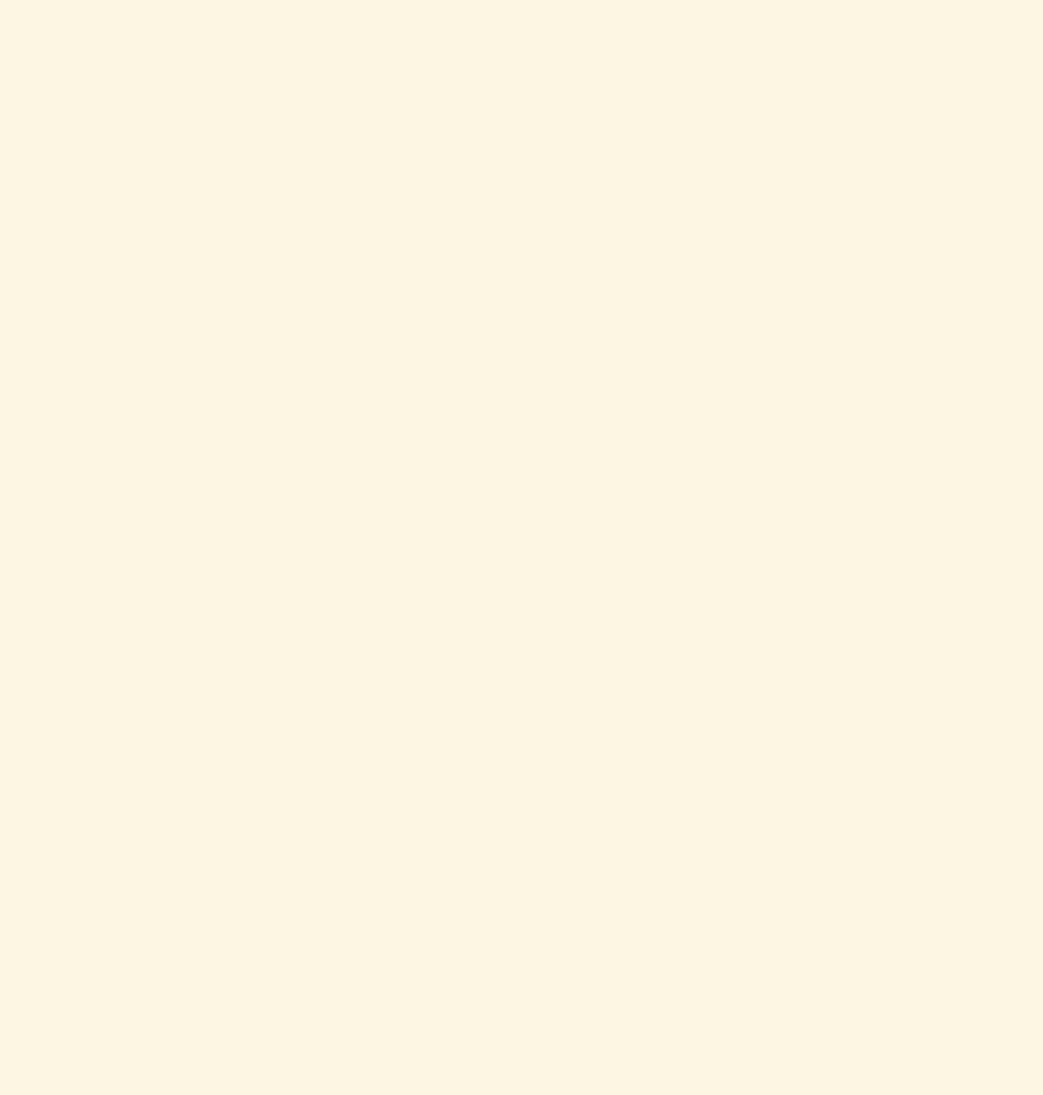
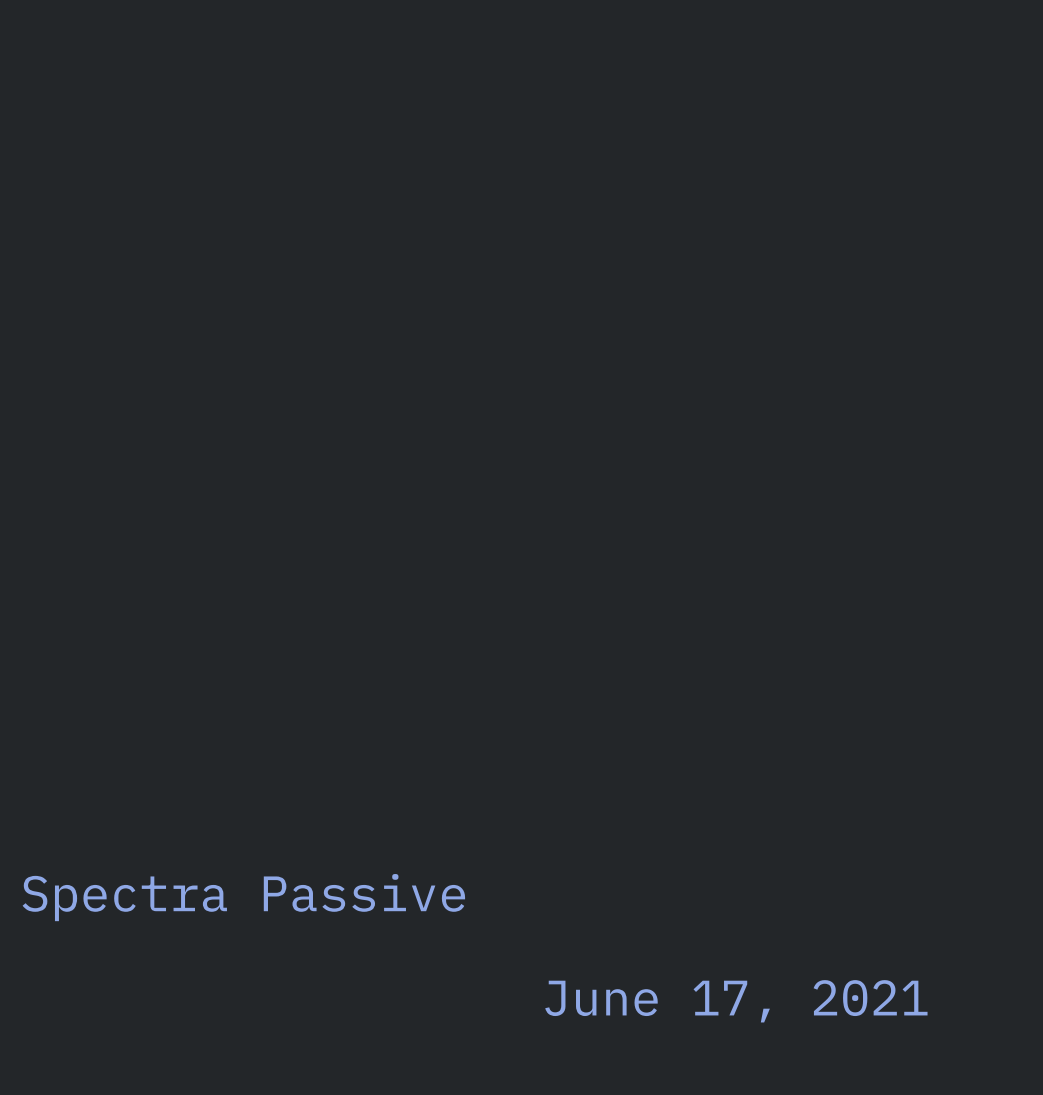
text: none -> Spectra Passive (243, 897)
text: none -> June 17, 2021 (736, 1001)

